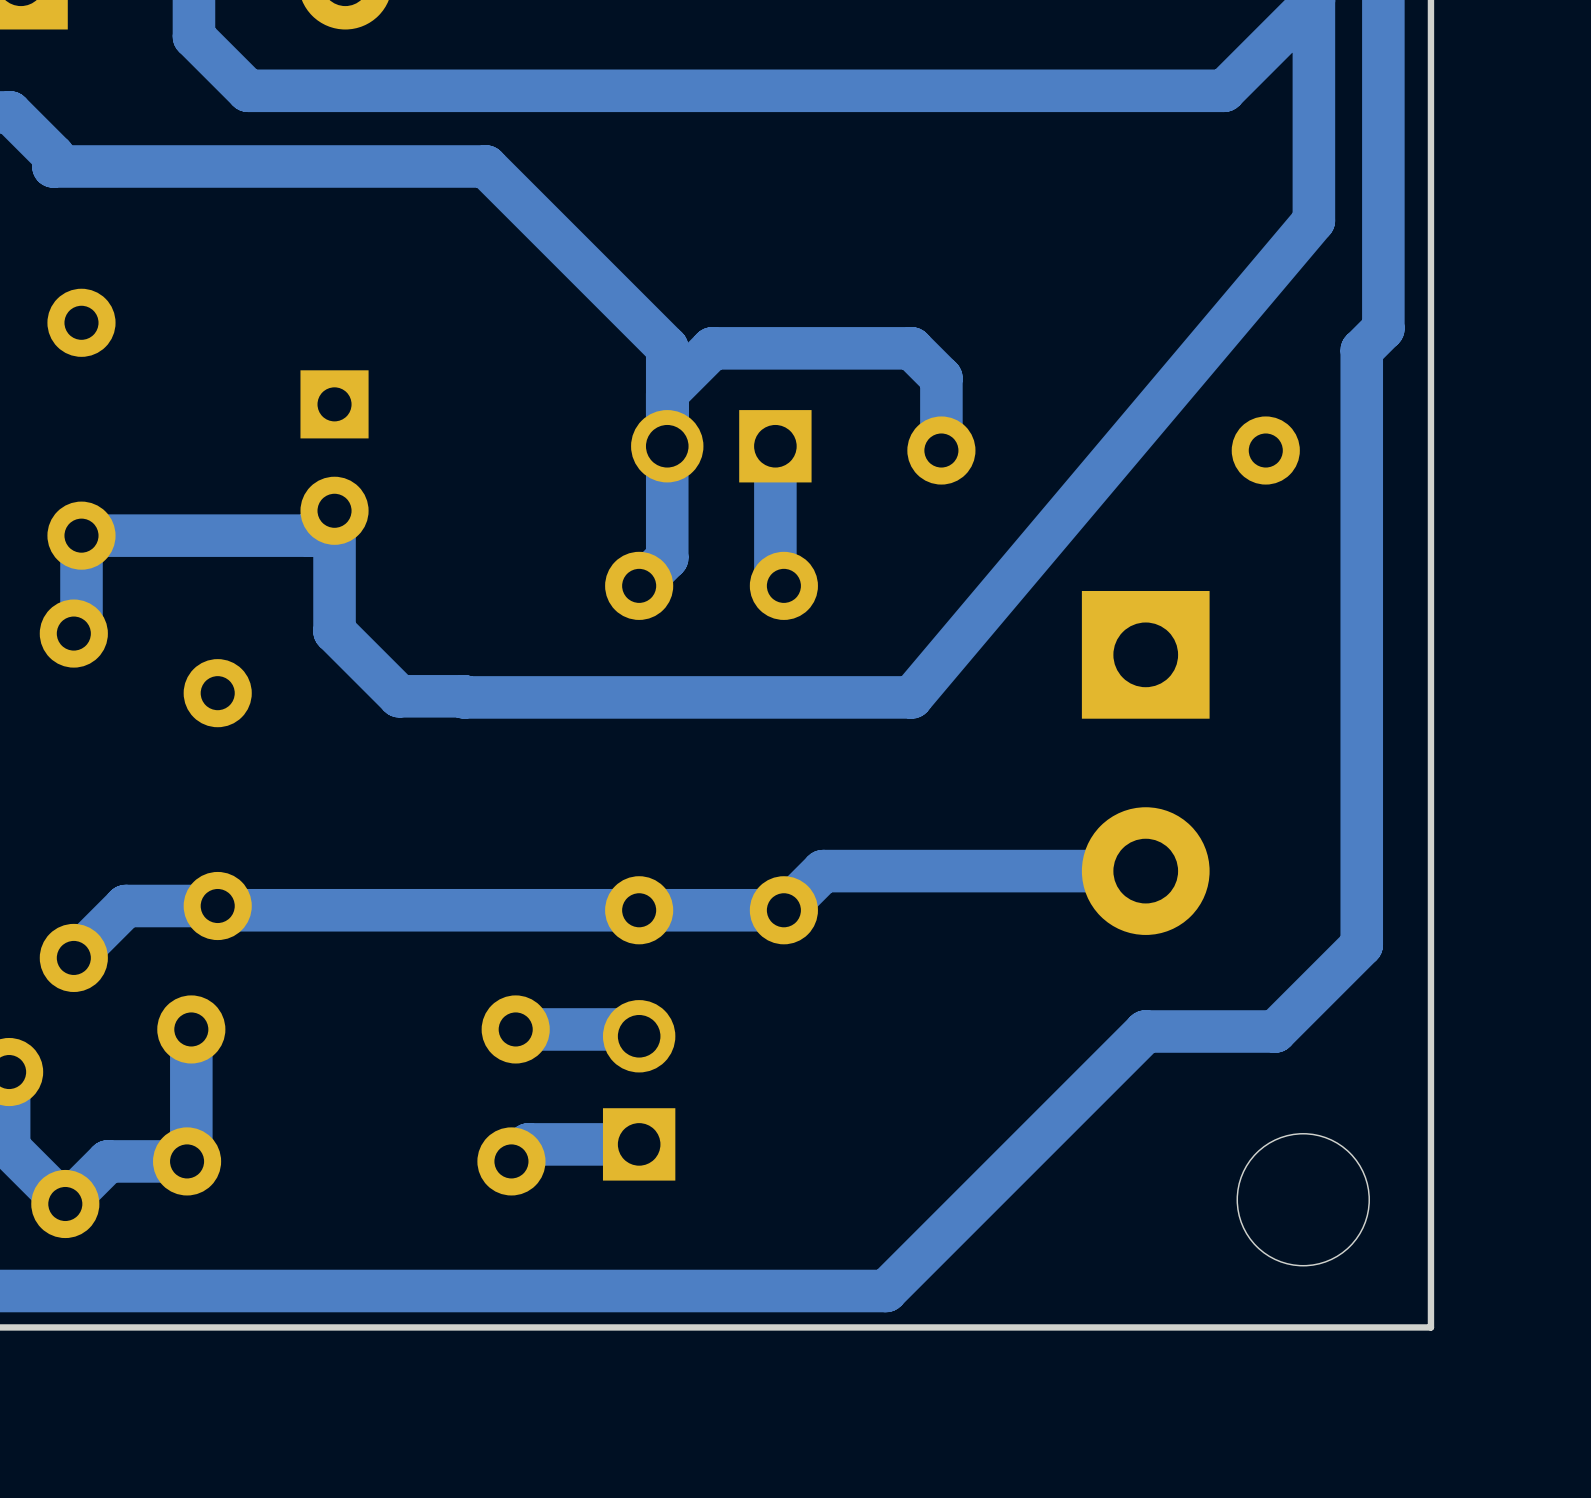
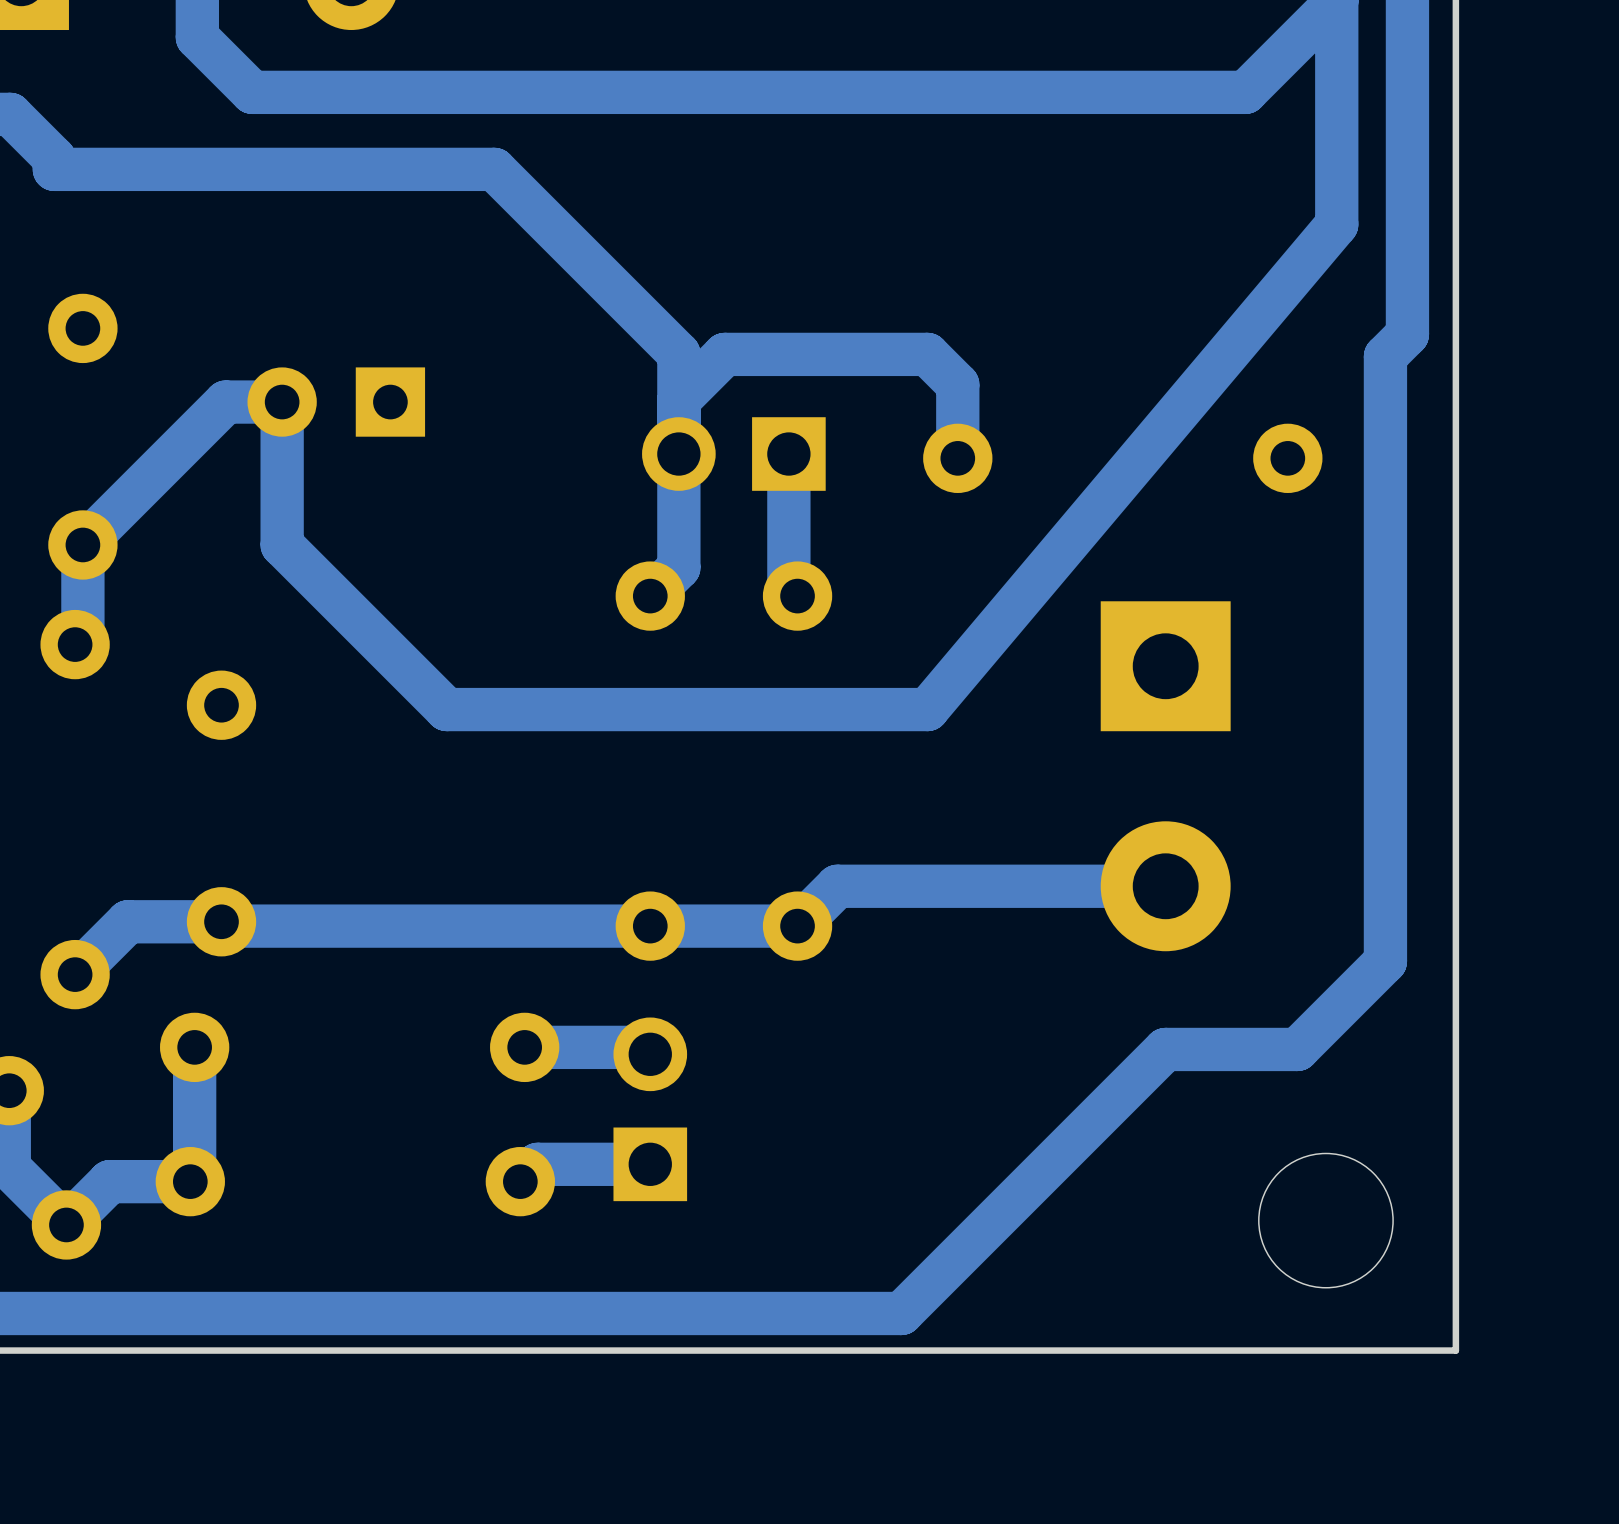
part rotation: 0° (334, 457) -> 90° clockwise (336, 402)
track: (81, 535) (309, 535) (334, 510) (334, 631) (399, 696) (464, 697) -> (82, 544) (225, 402) (282, 402) (282, 544) (446, 709) (472, 709)

